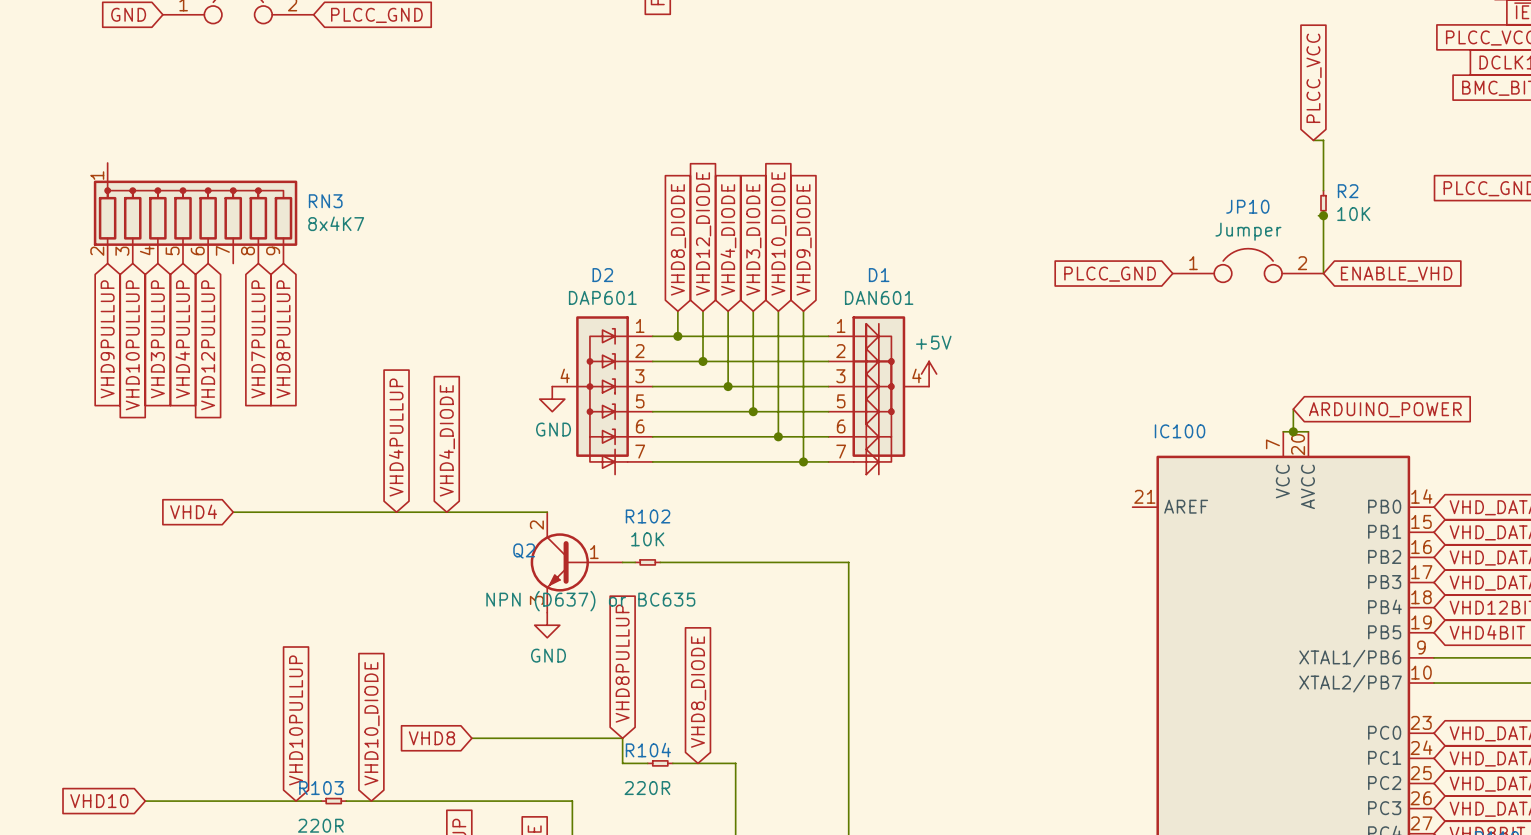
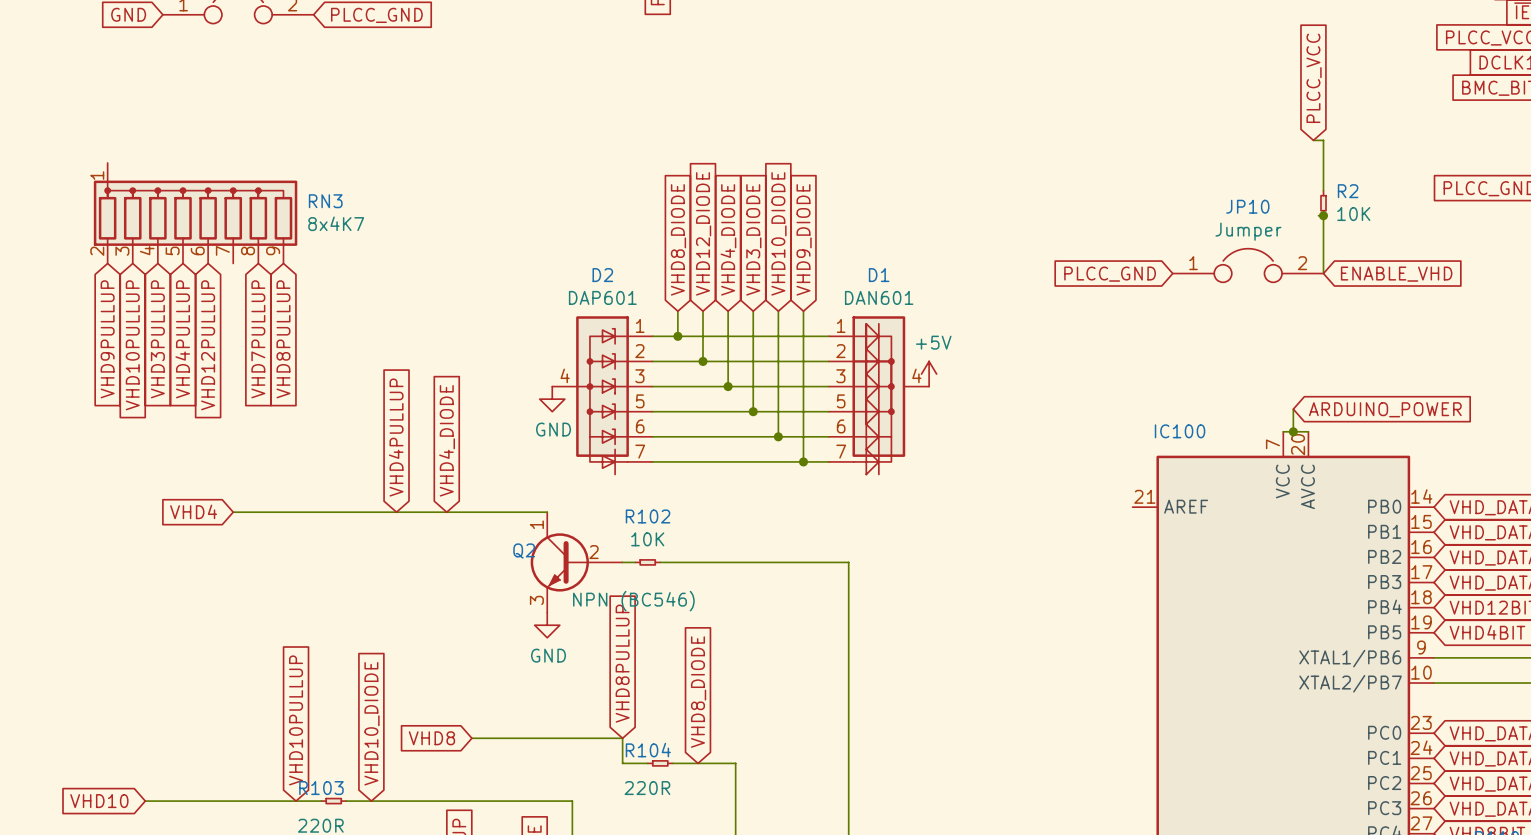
Q2 pin number: 2 (536, 525) -> 1 (536, 524)
Q2 pin number: 1 (594, 552) -> 2 (594, 552)
Q2 value: NPN (D637) or BC635 (590, 601) -> NPN (BC546) (633, 601)

